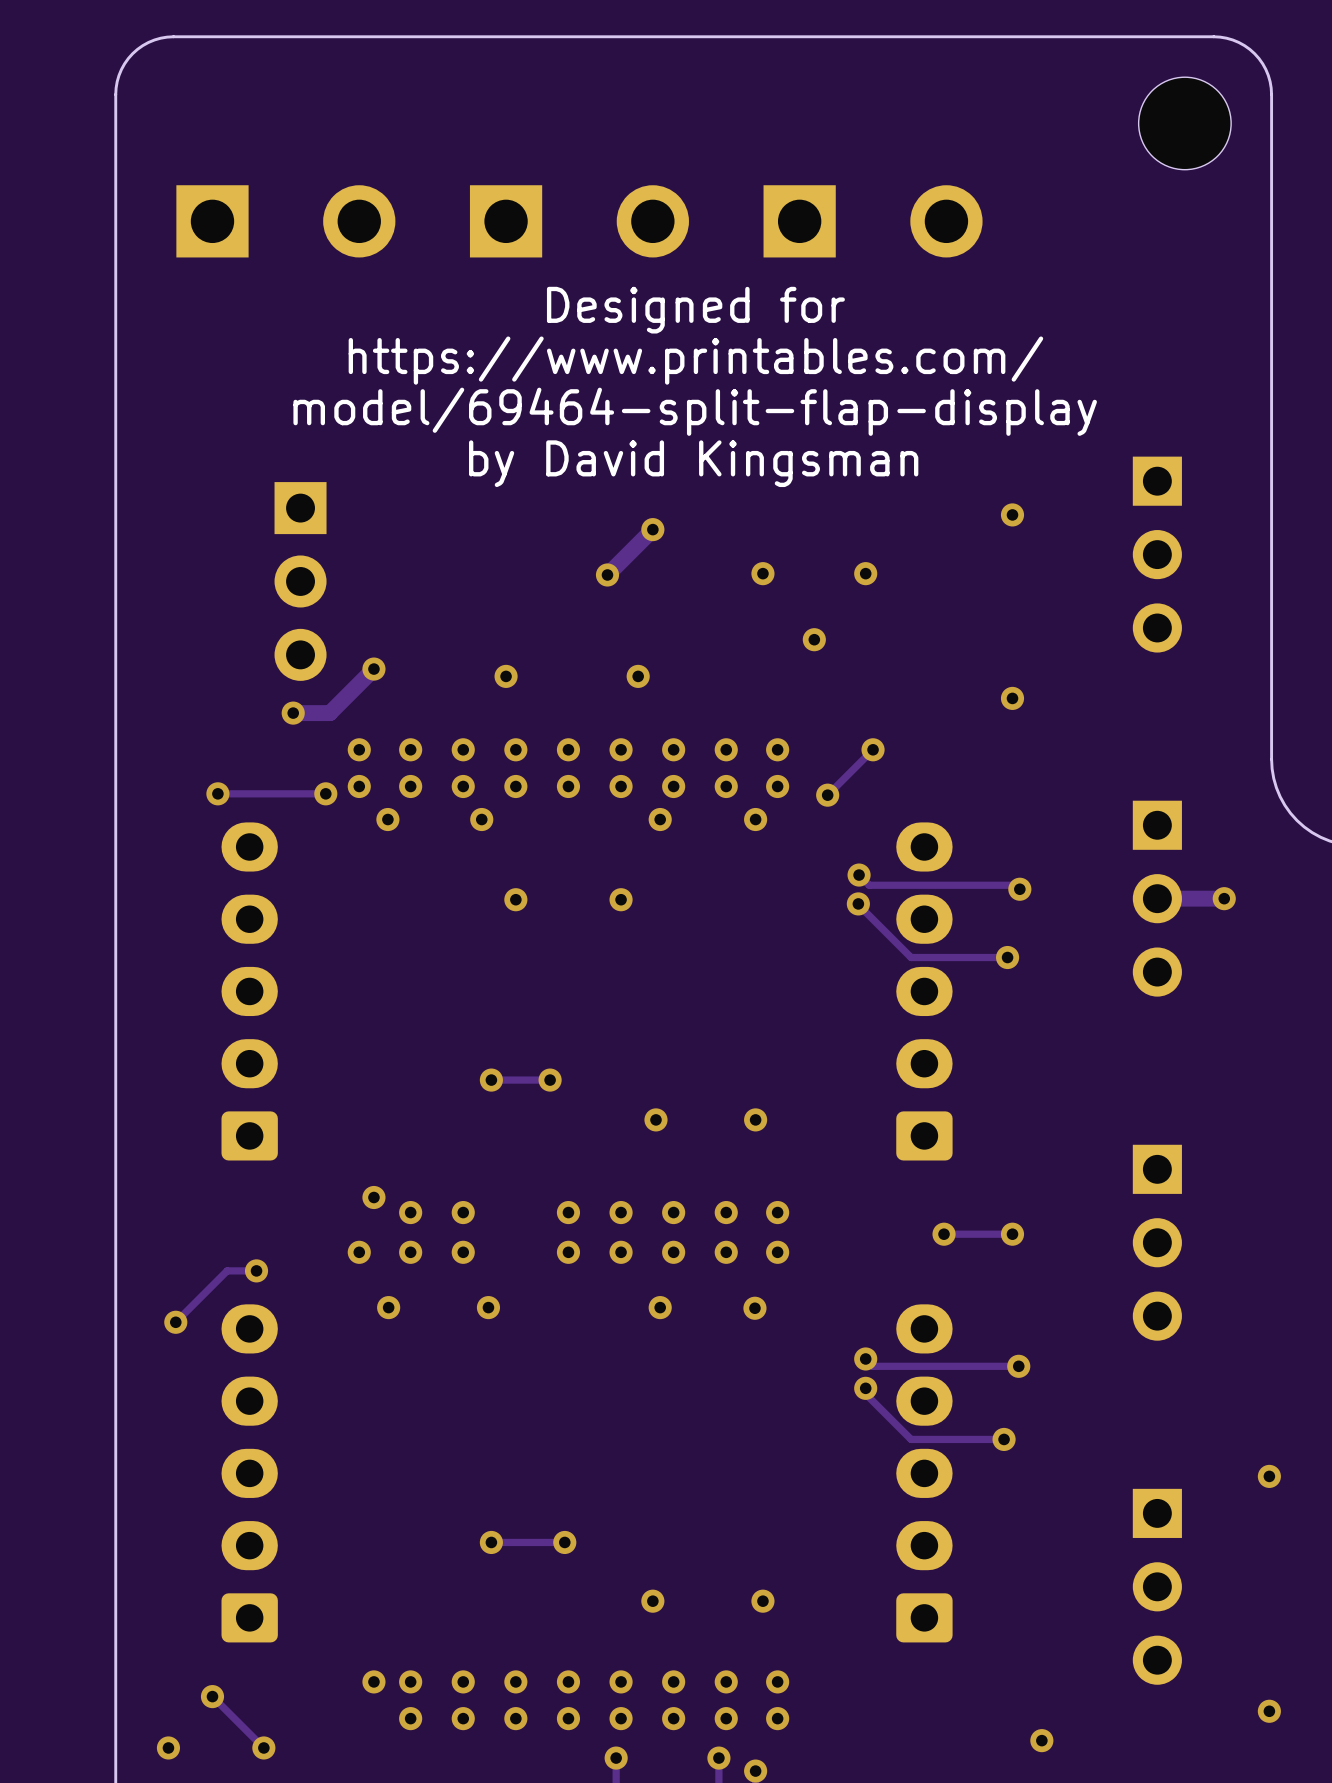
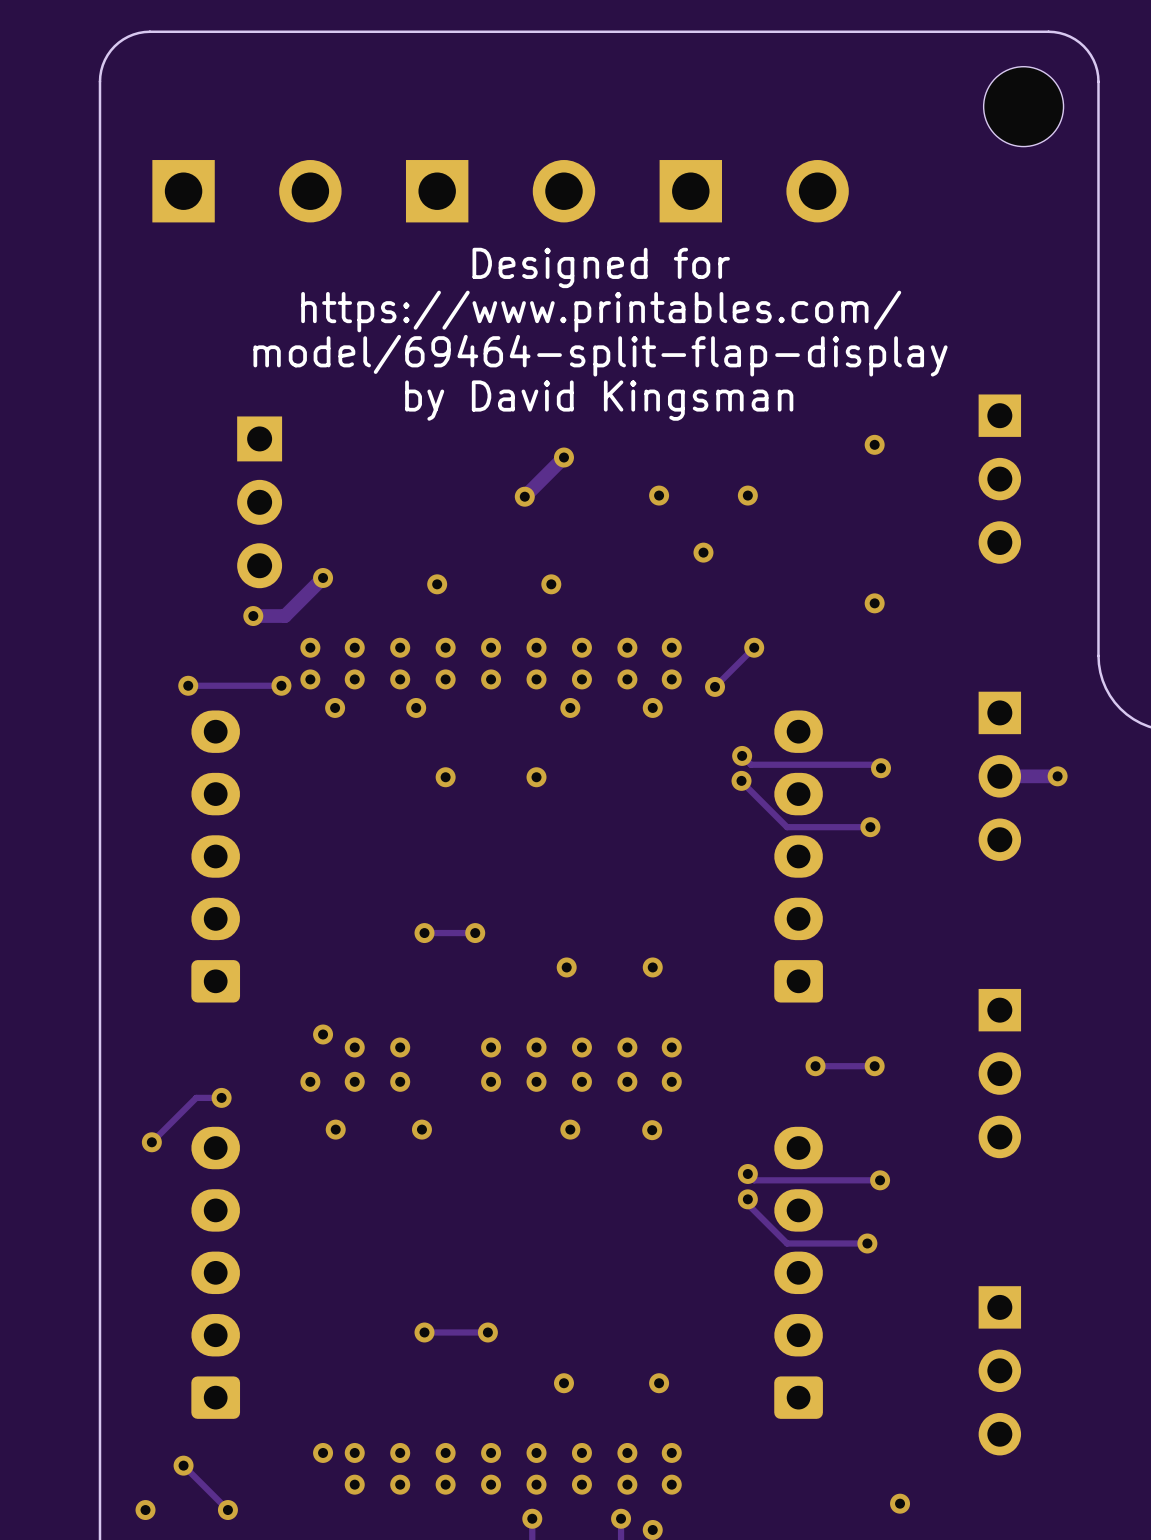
via: (1269, 1476) -> none
via: (1269, 1711) -> none

